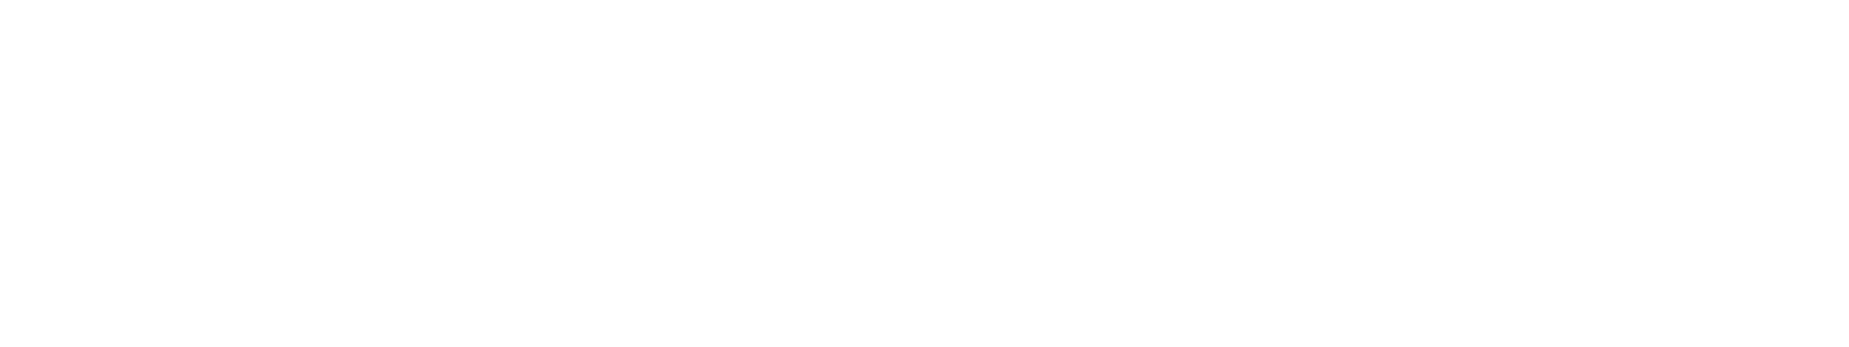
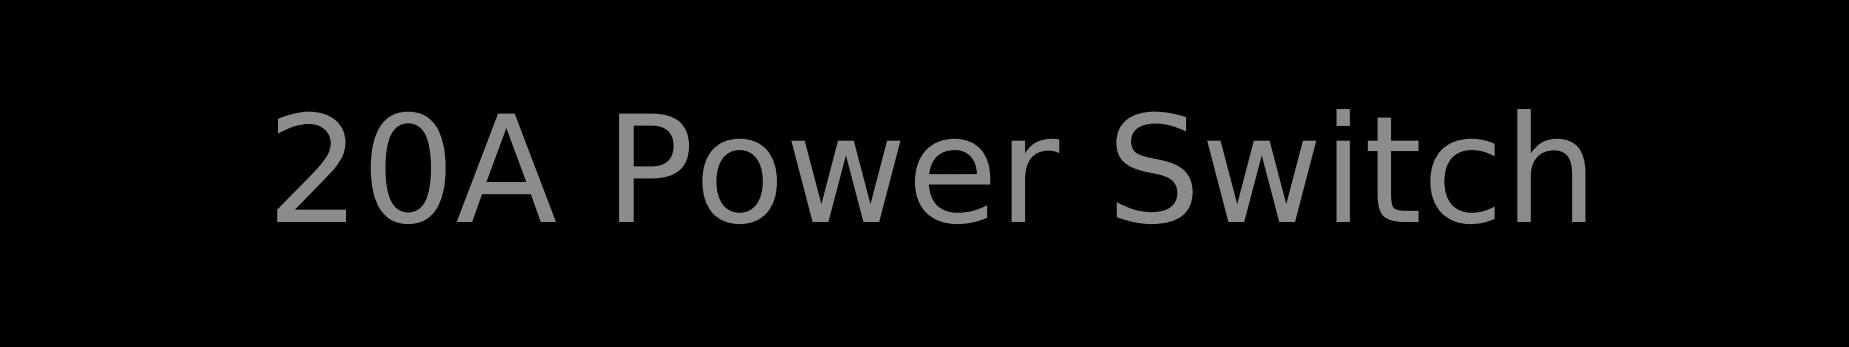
text: none -> 20A Power Switch (931, 166)

